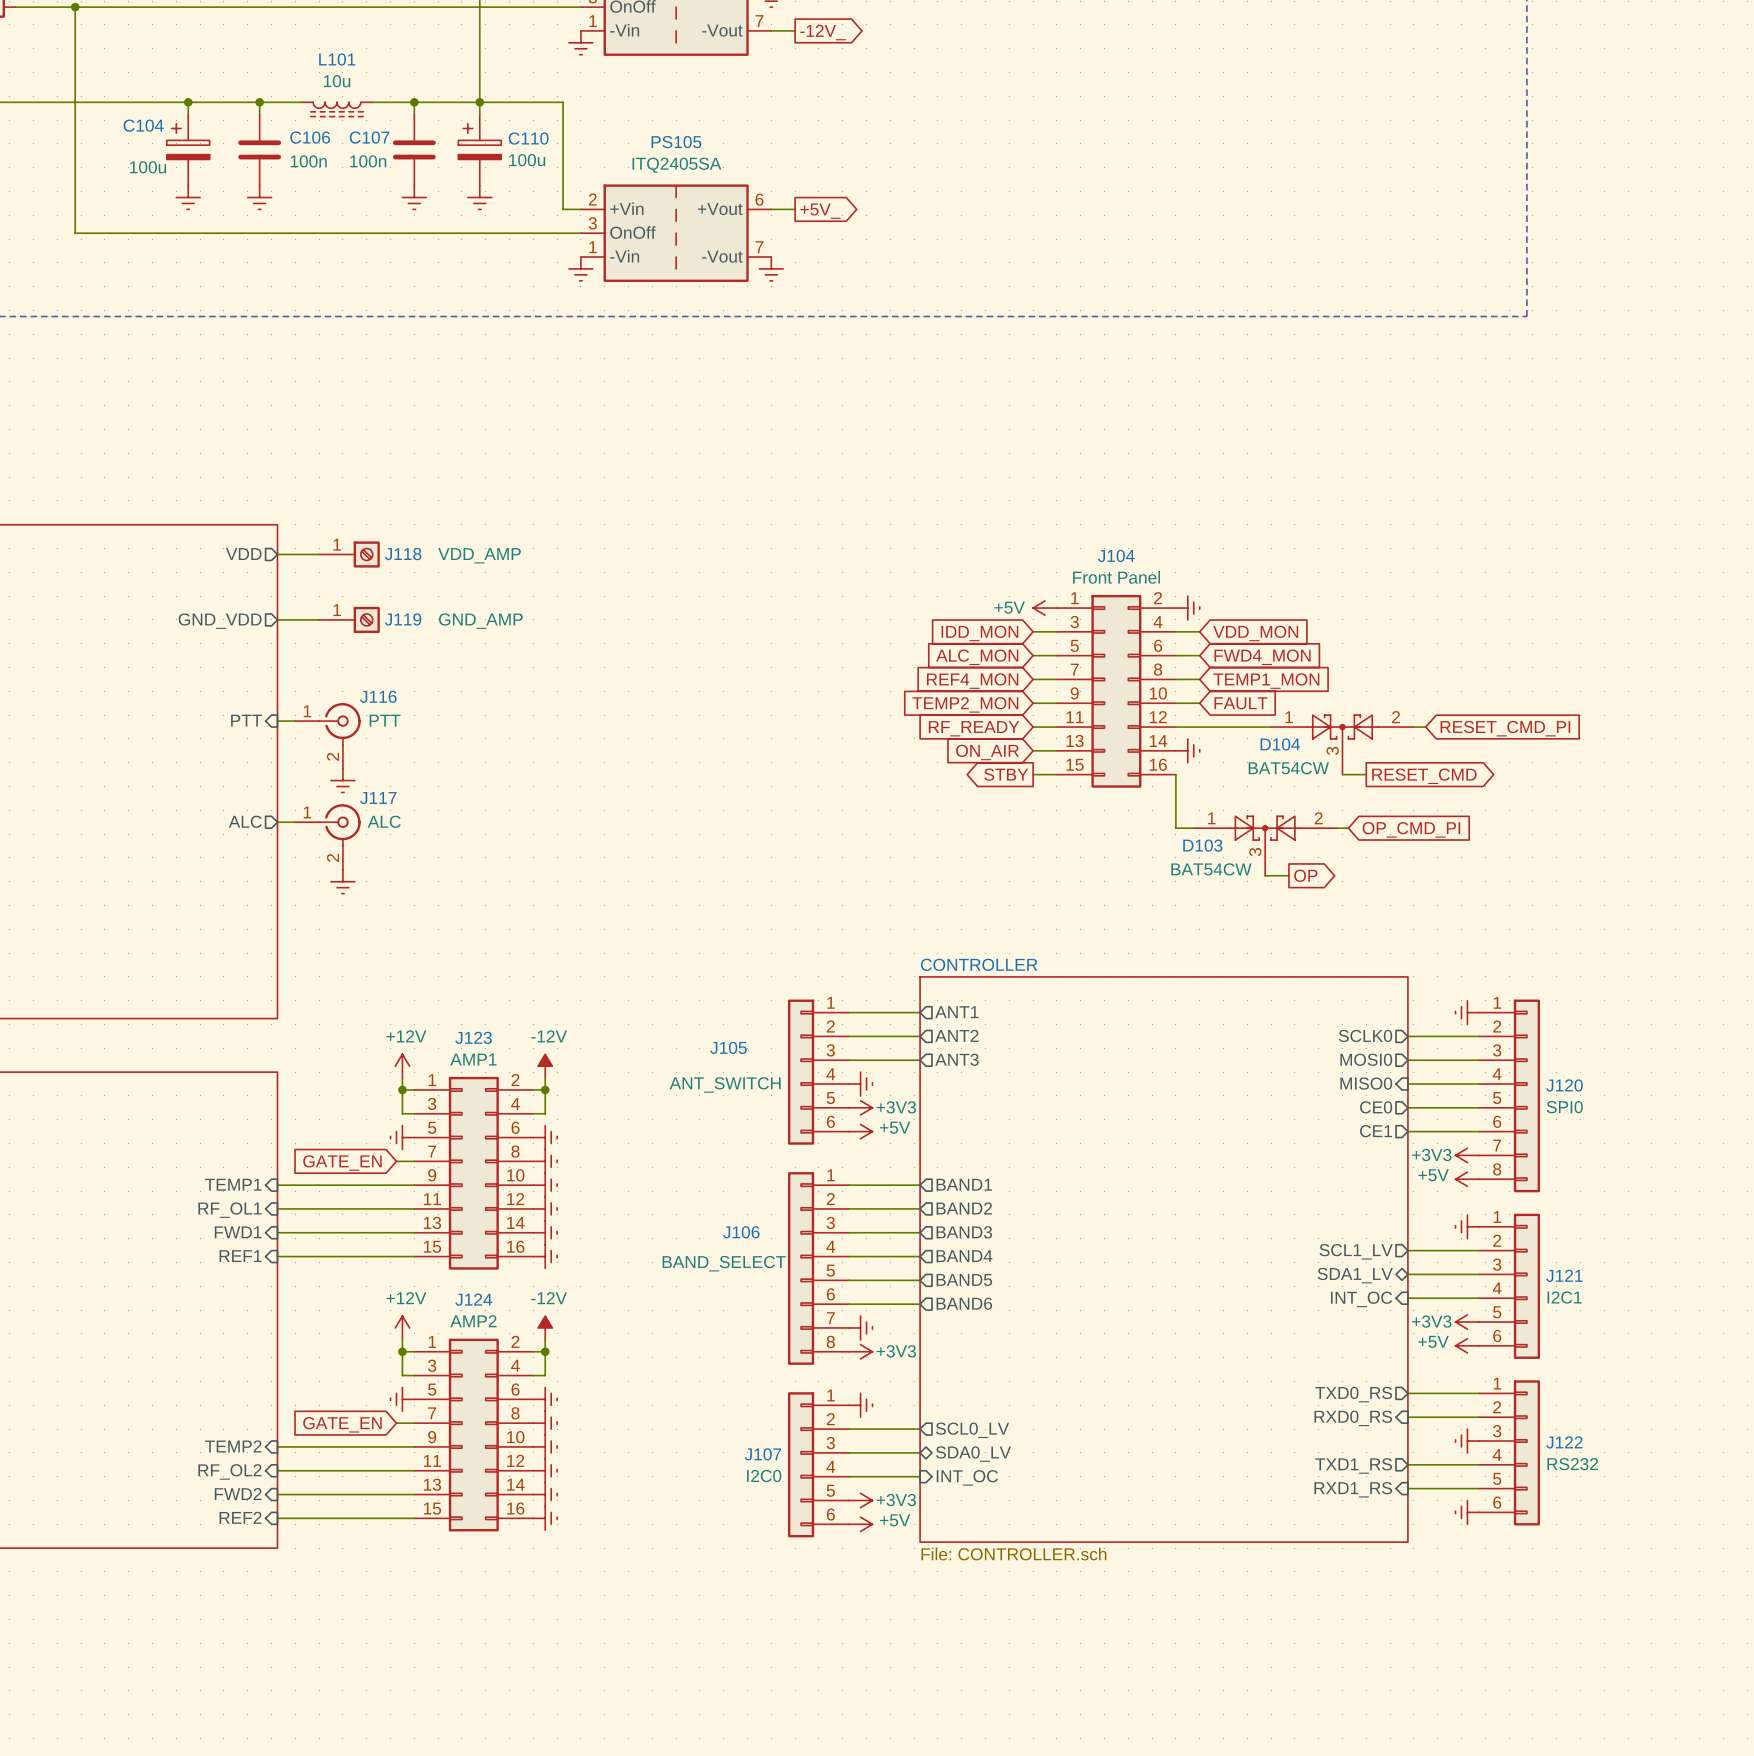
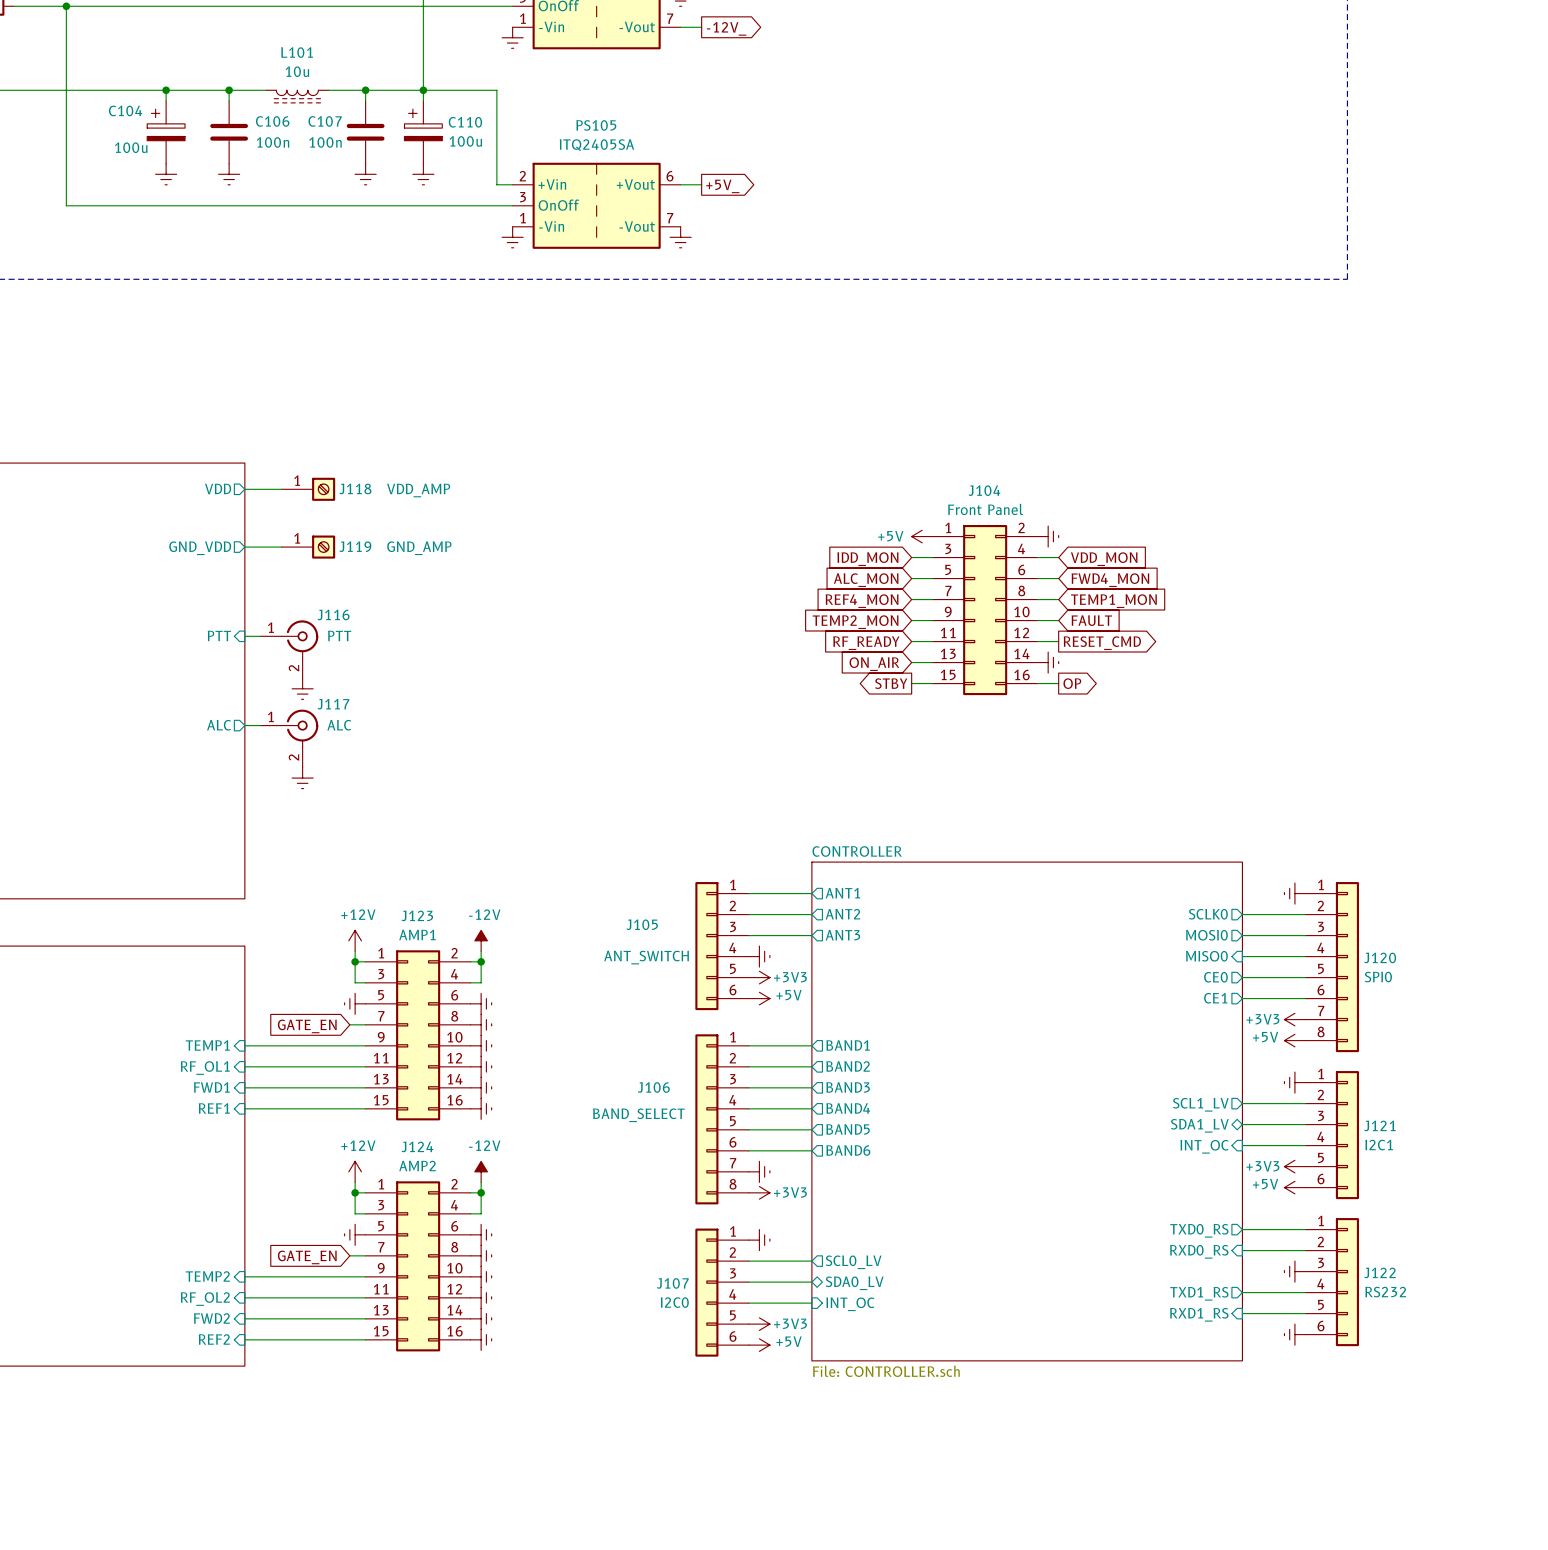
wire: (1199, 727) (1271, 727) -> none
wire: (1413, 727) (1425, 727) -> none
global label: RESET_CMD_PI (1505, 728) -> none
D104: BAT54CW (1342, 744) -> none
wire: (1175, 774) (1175, 828) (1193, 828) -> (1037, 683) (1058, 683)
wire: (1342, 774) (1366, 774) -> none
global label position: RESET_CMD (1424, 776) -> RESET_CMD (1102, 643)
wire: (1336, 828) (1348, 828) -> none
global label: OP_CMD_PI (1411, 829) -> none
D103: BAT54CW (1265, 846) -> none
wire: (1265, 875) (1288, 875) -> none
global label position: OP (1305, 875) -> OP (1072, 683)

